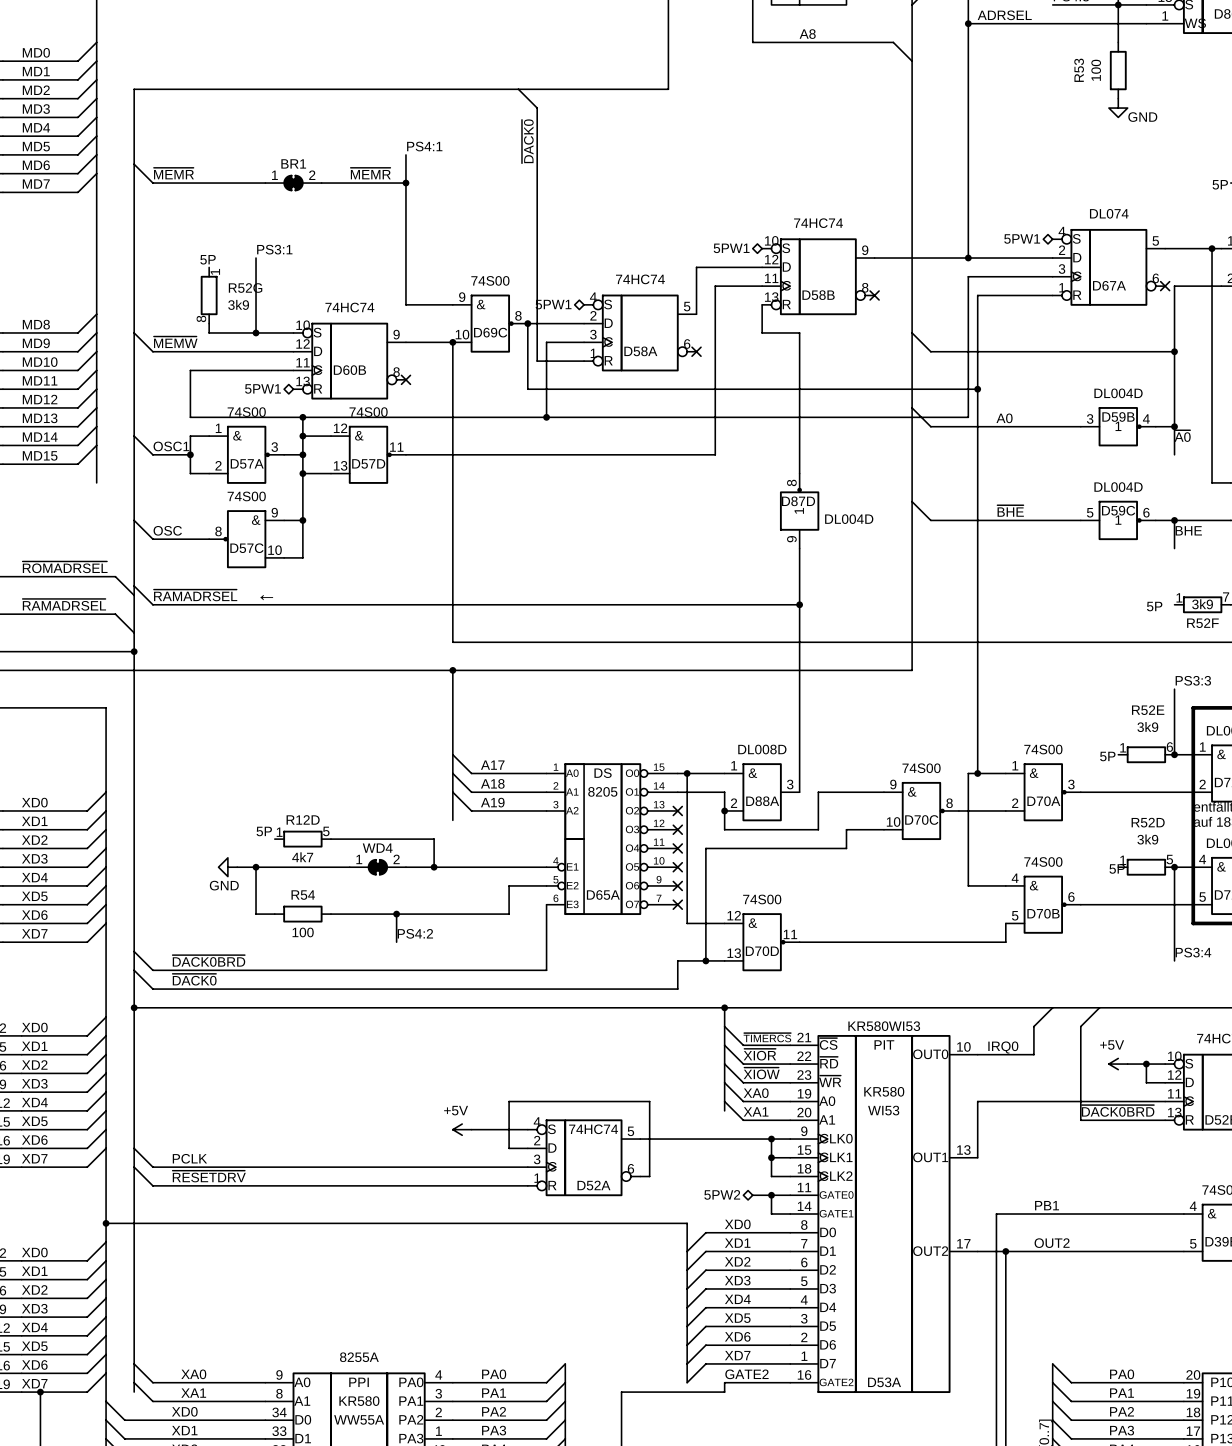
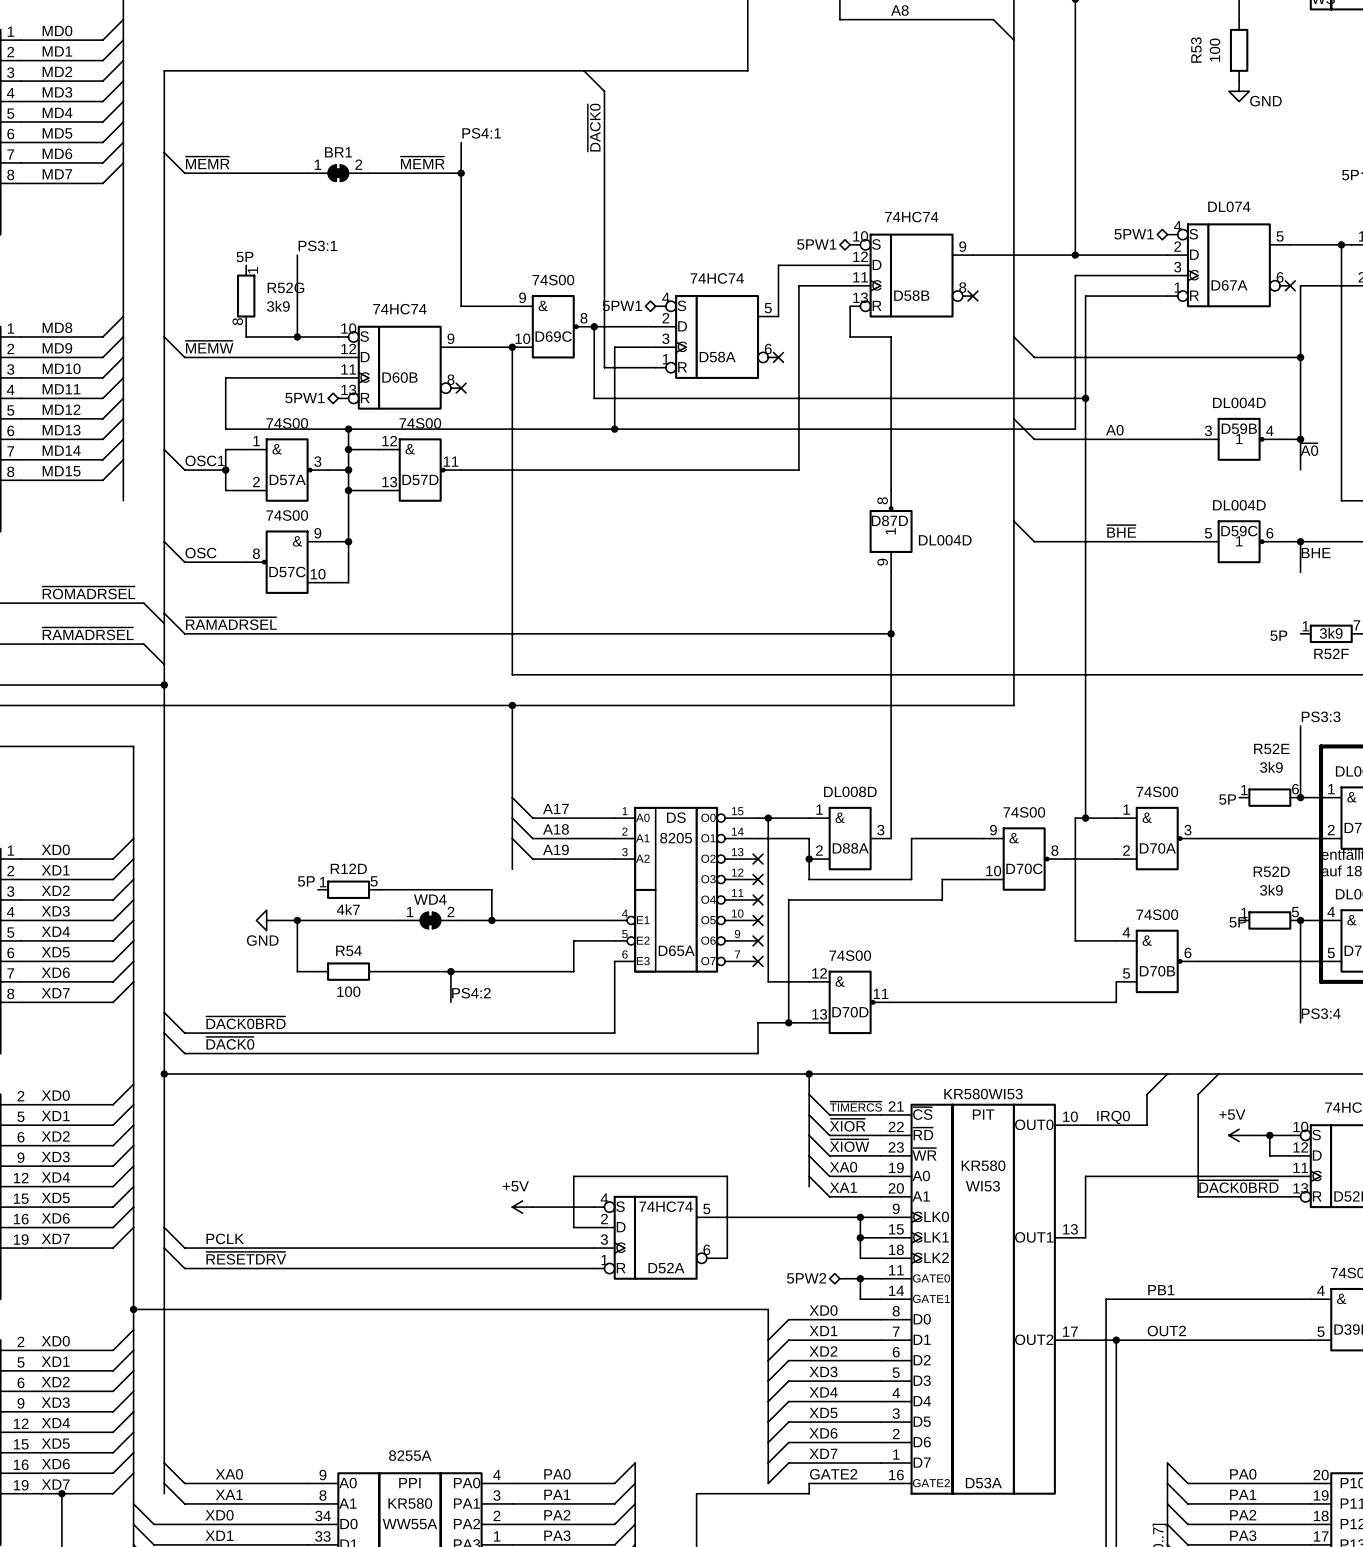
text: ← (266, 597) -> none

